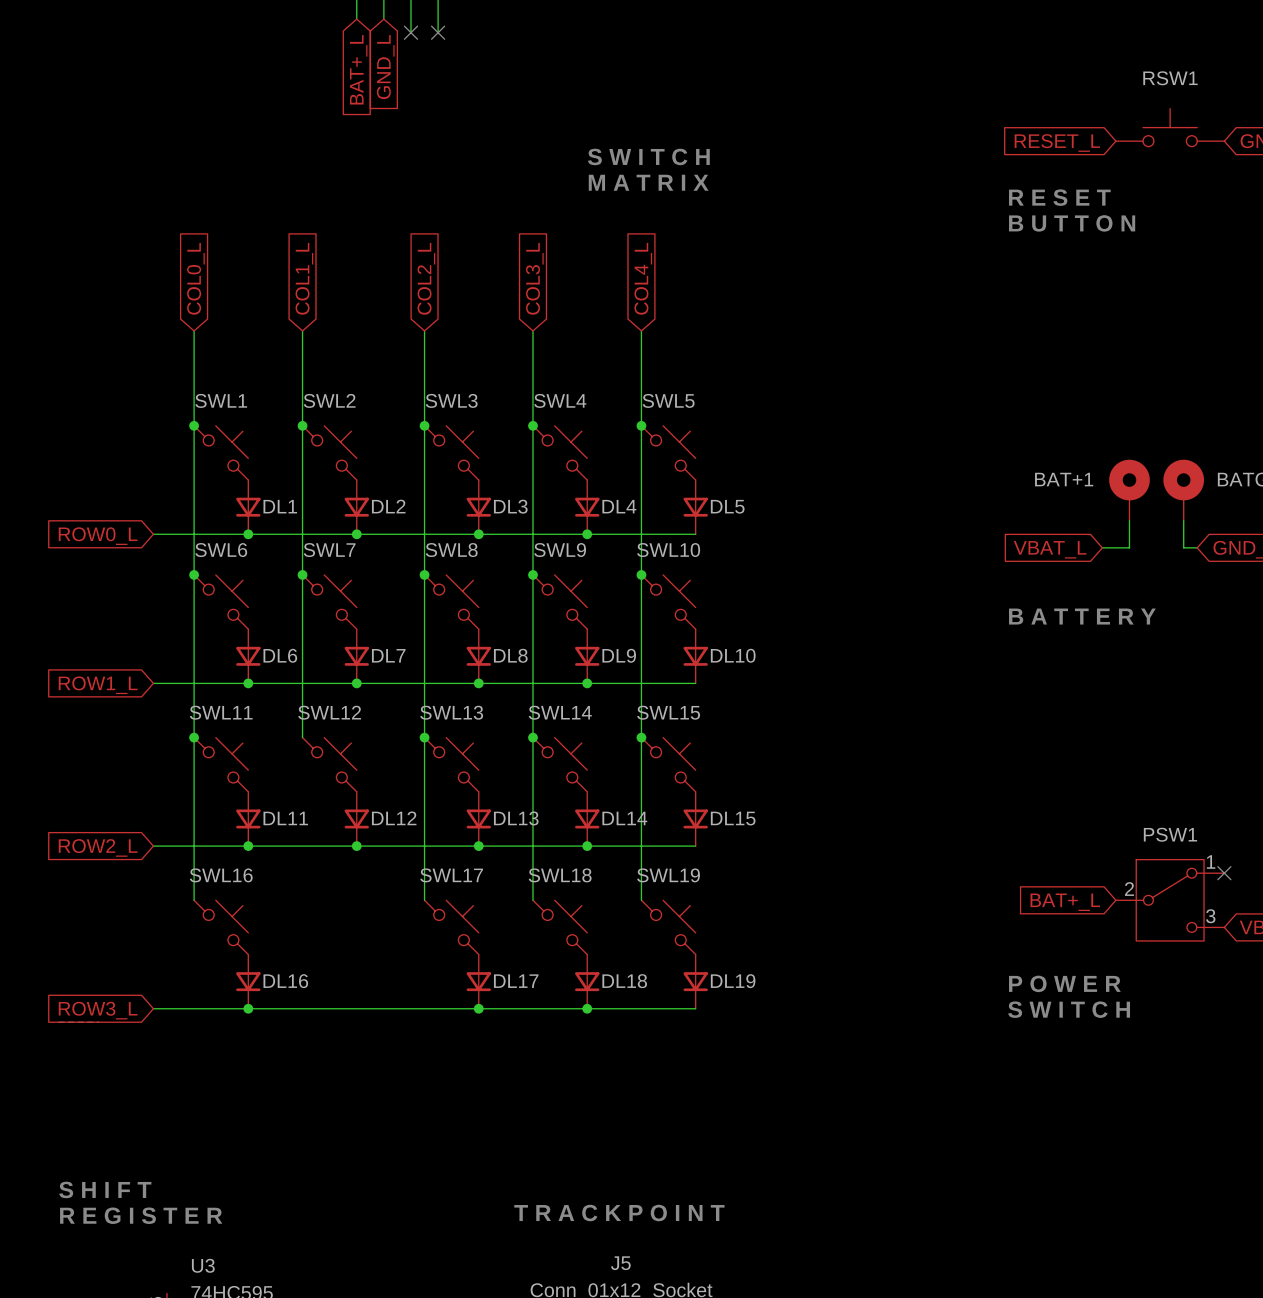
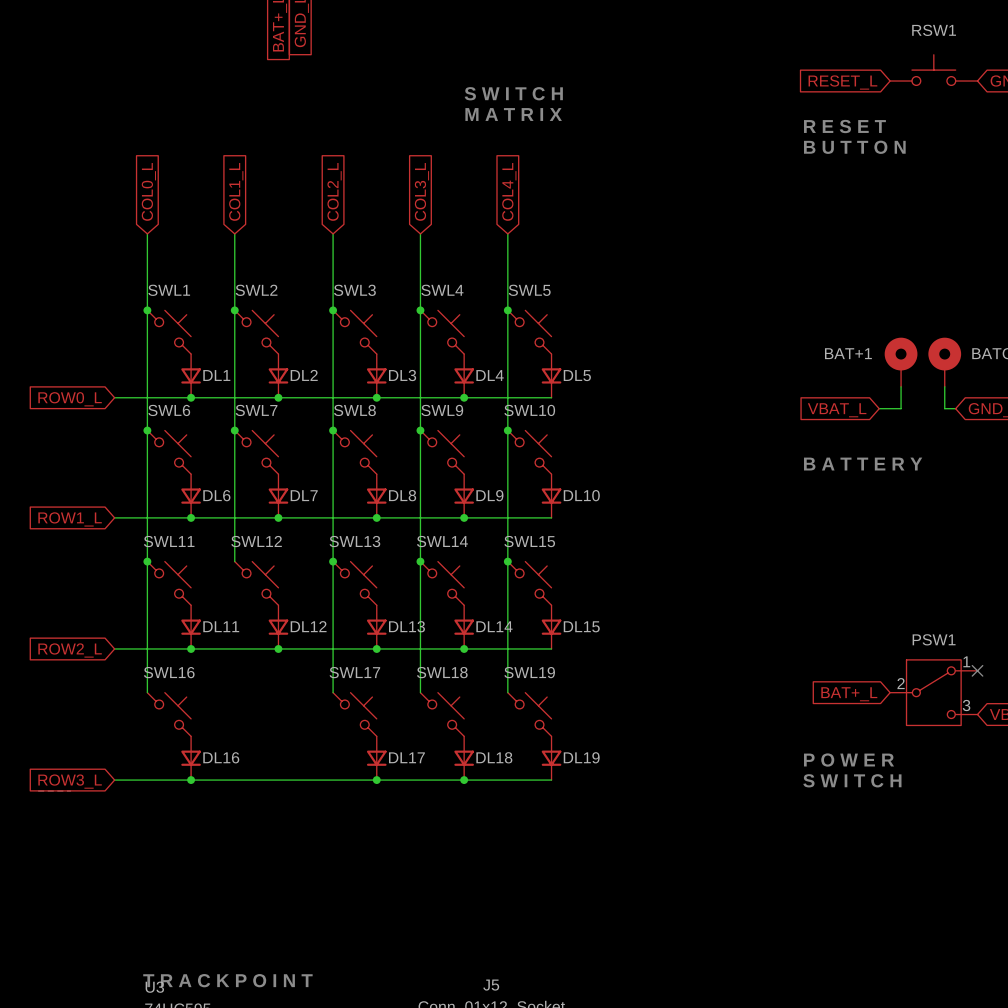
text: S H I F T (105, 1189) -> none
text: T R A C K P O I N T (619, 1213) -> none
text: R E G I S T E R (141, 1215) -> none
text: none -> T R A C K P O I N T (227, 980)

